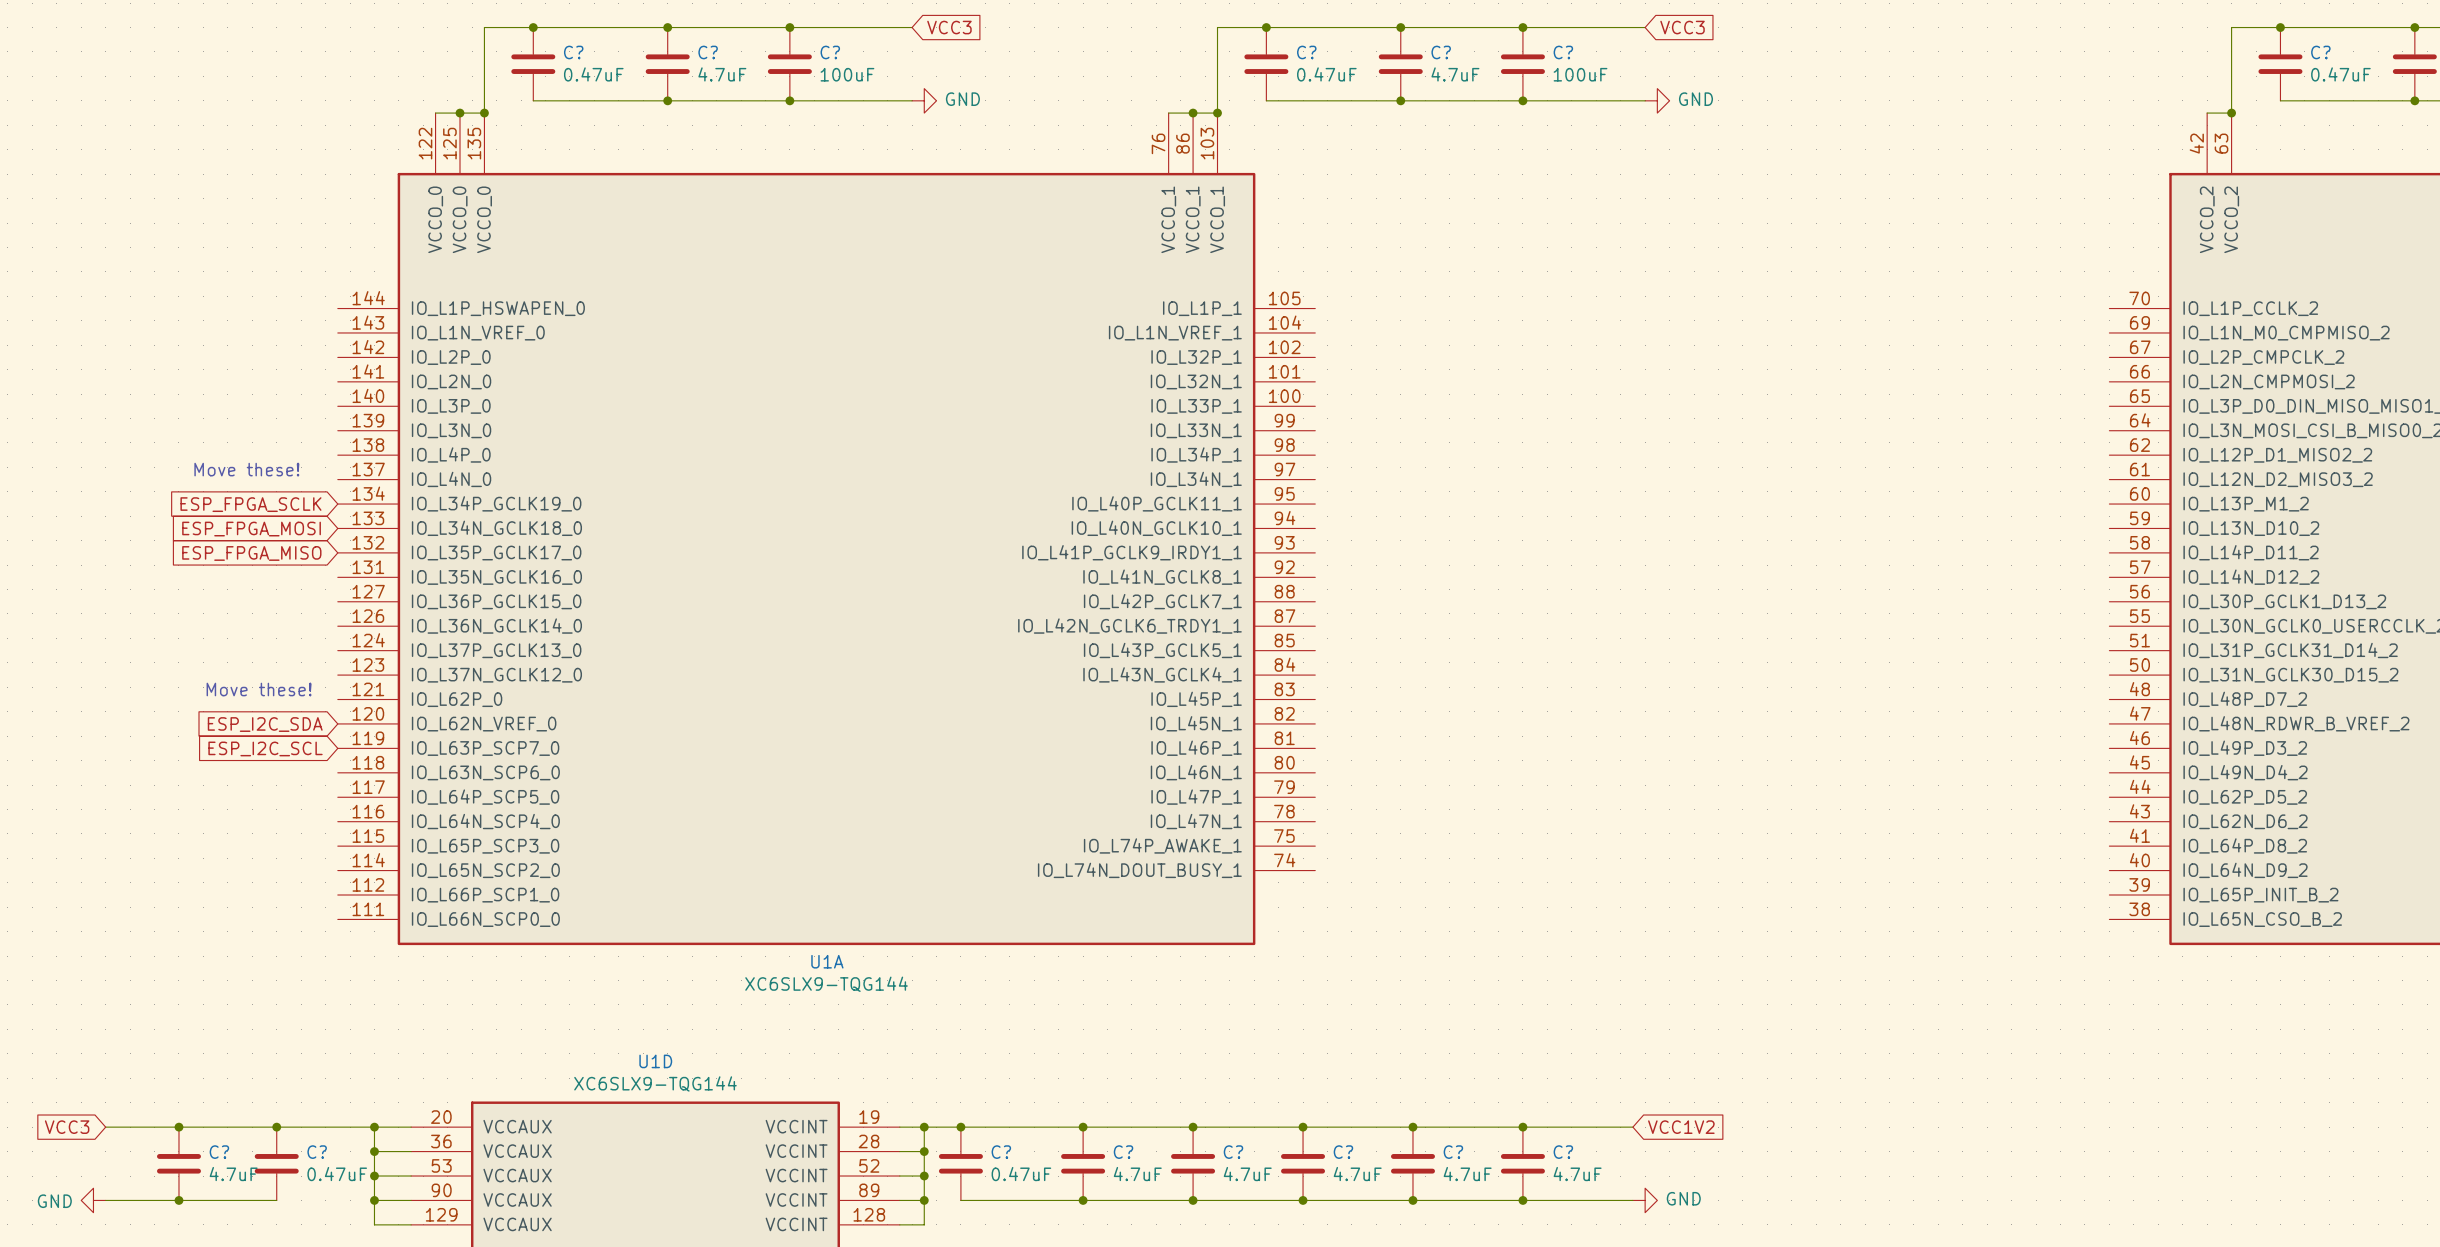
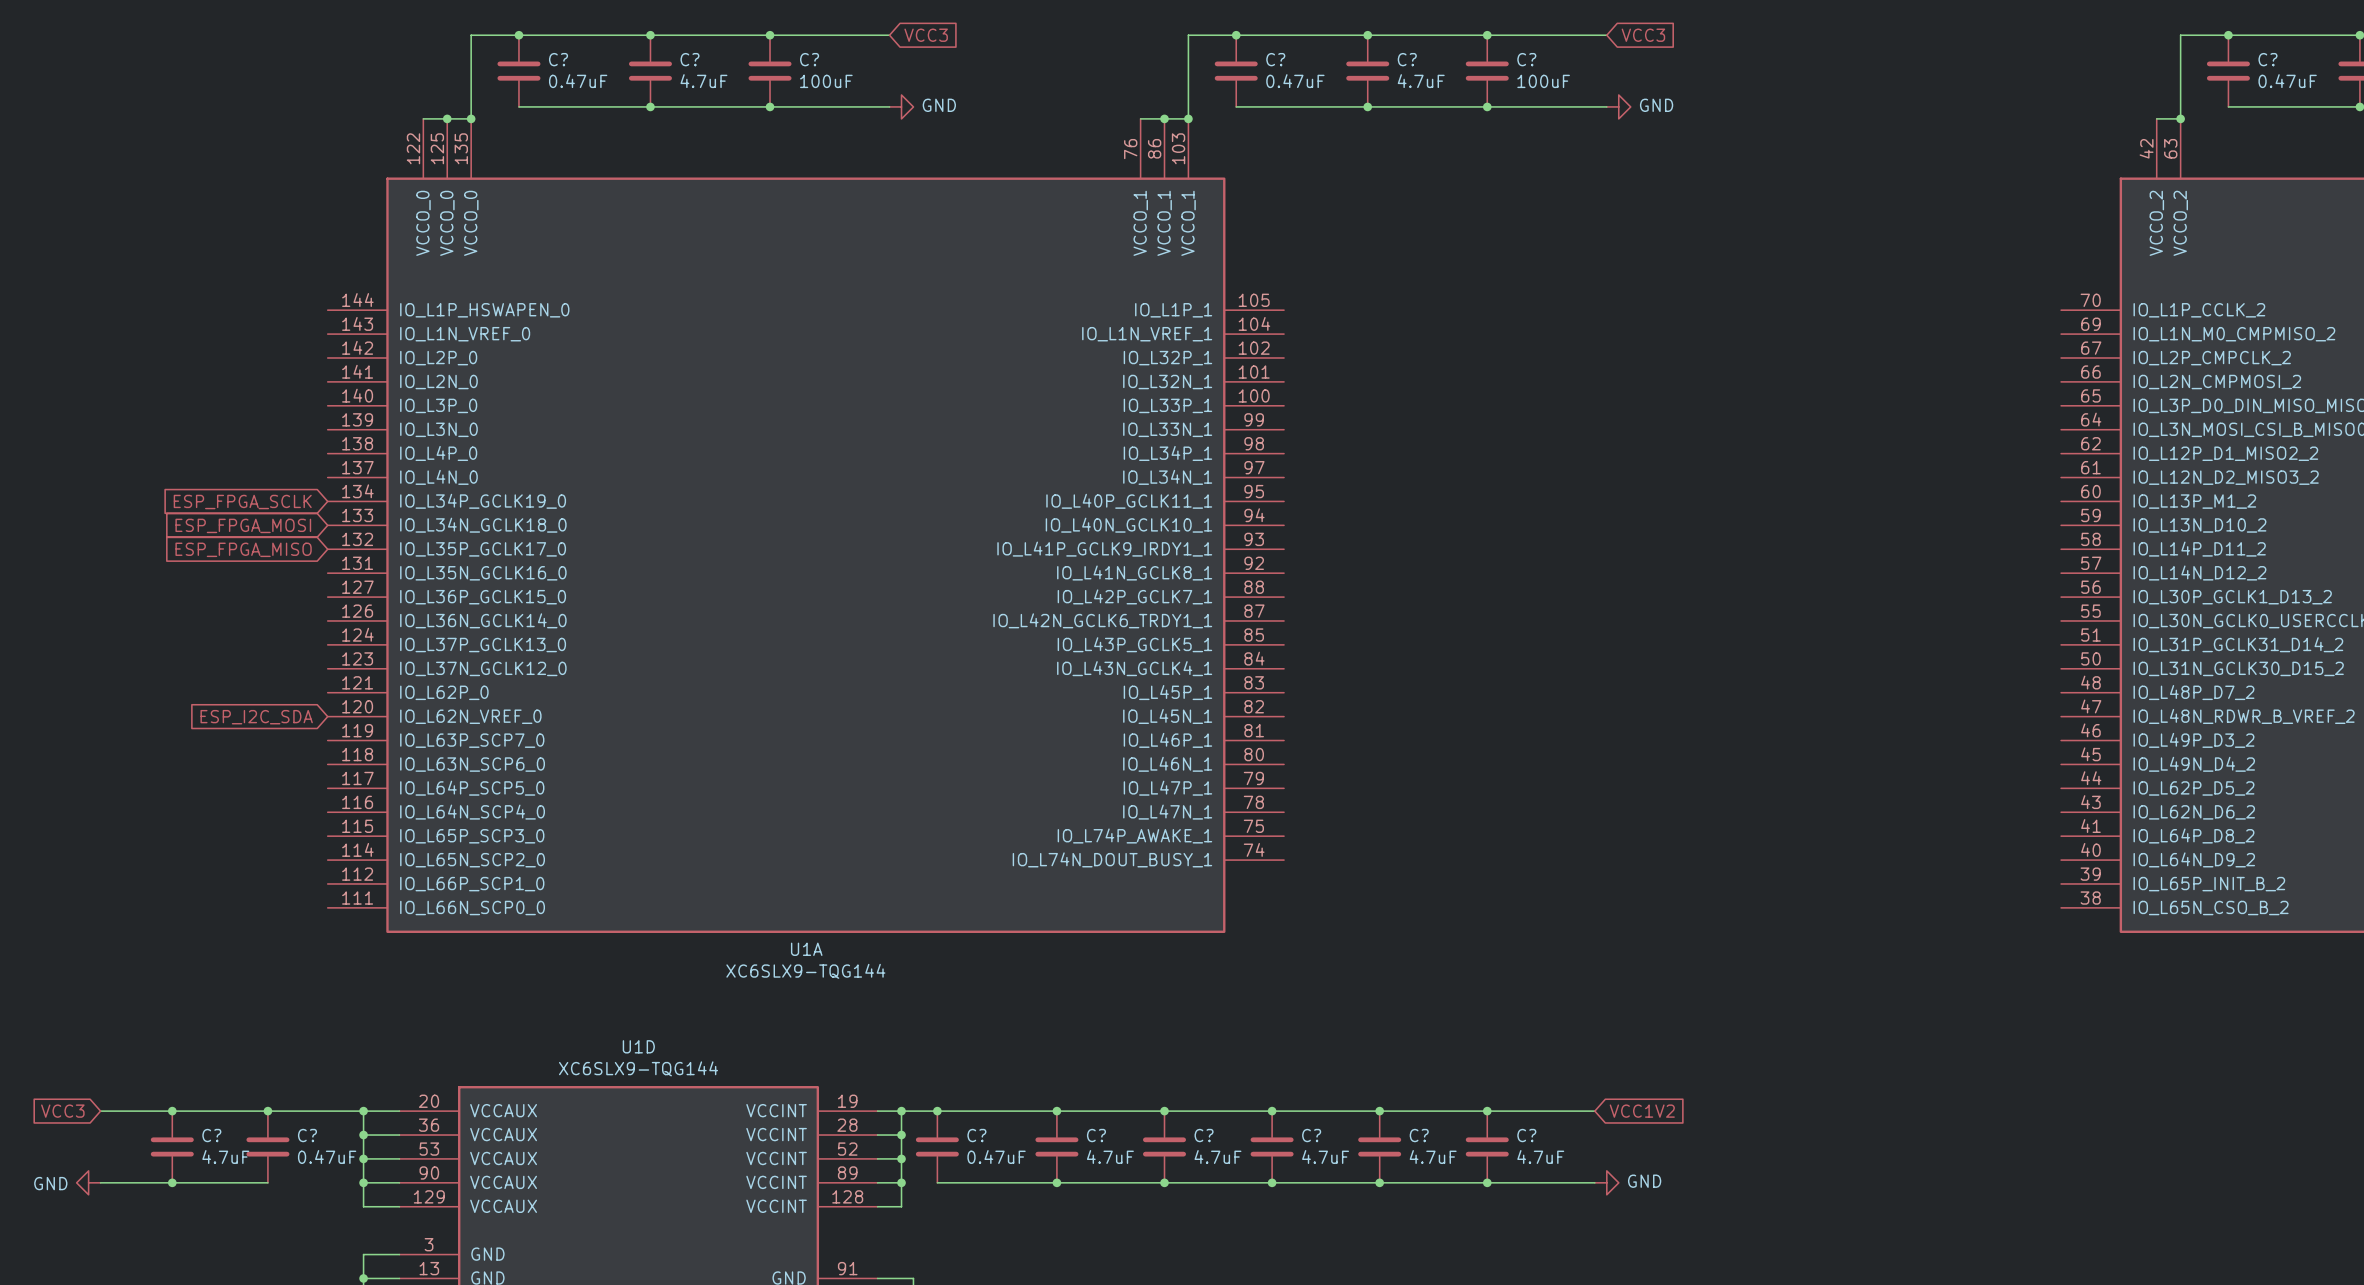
text: Move these! (246, 469) -> none
text: Move these! (259, 689) -> none
global label: ESP_I2C_SCL (265, 748) -> none

